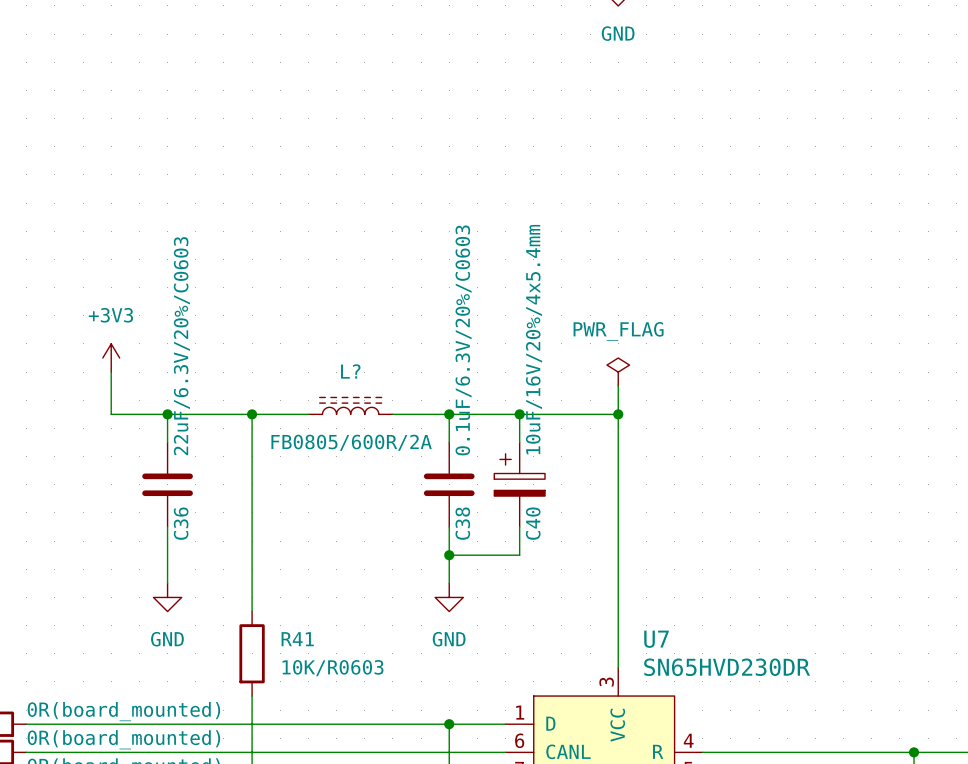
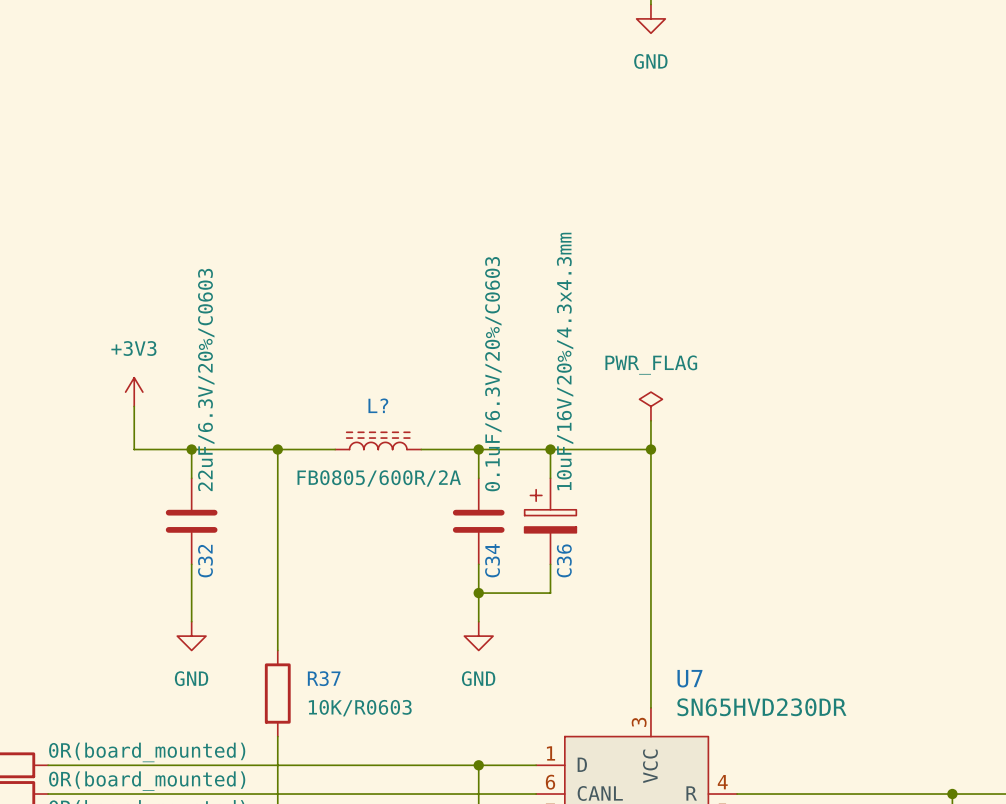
C40 value: 10uF/16V/20%/4x5.4mm (533, 339) -> 10uF/16V/20%/4.3x4.3mm (565, 361)
C36 name: C36 (181, 523) -> C32 (205, 561)
C38 name: C38 (462, 523) -> C34 (492, 560)
C40 name: C40 (533, 523) -> C36 (564, 560)
R41 name: R41 (297, 639) -> R37 (324, 678)

